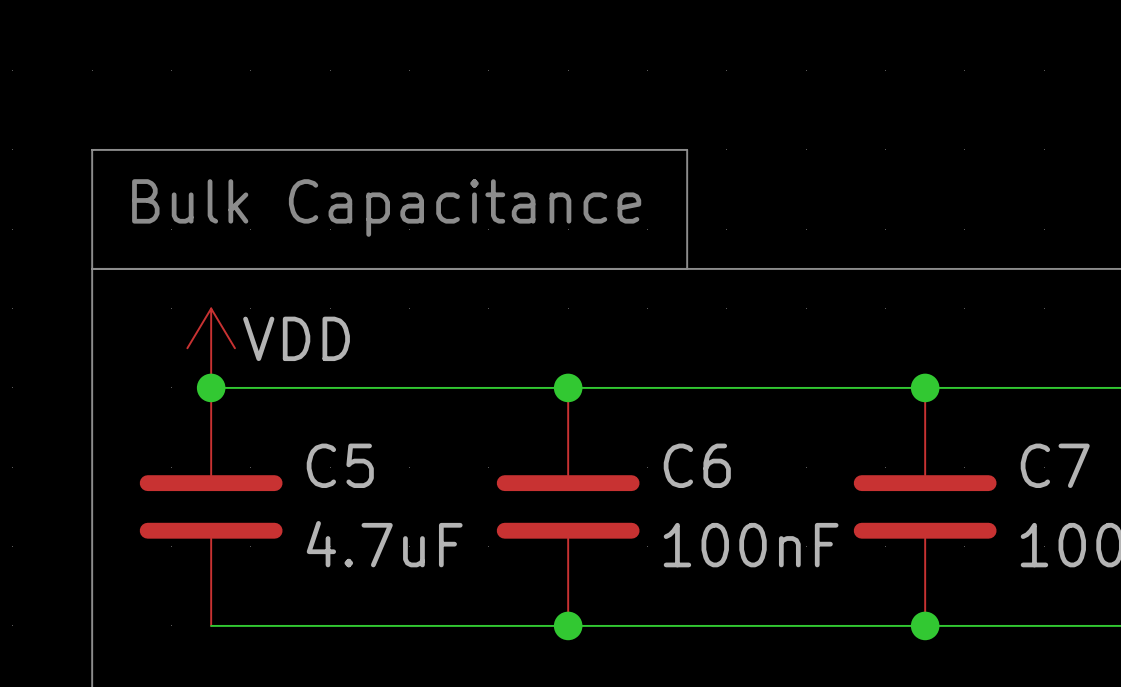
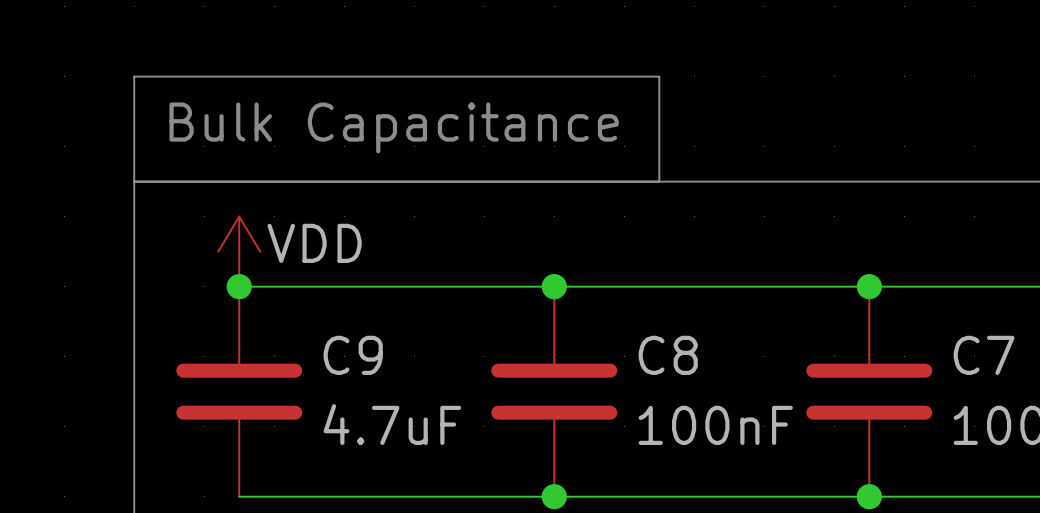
C5 name: C5 (340, 465) -> C9 (353, 355)
C6 name: C6 (697, 465) -> C8 (668, 355)

